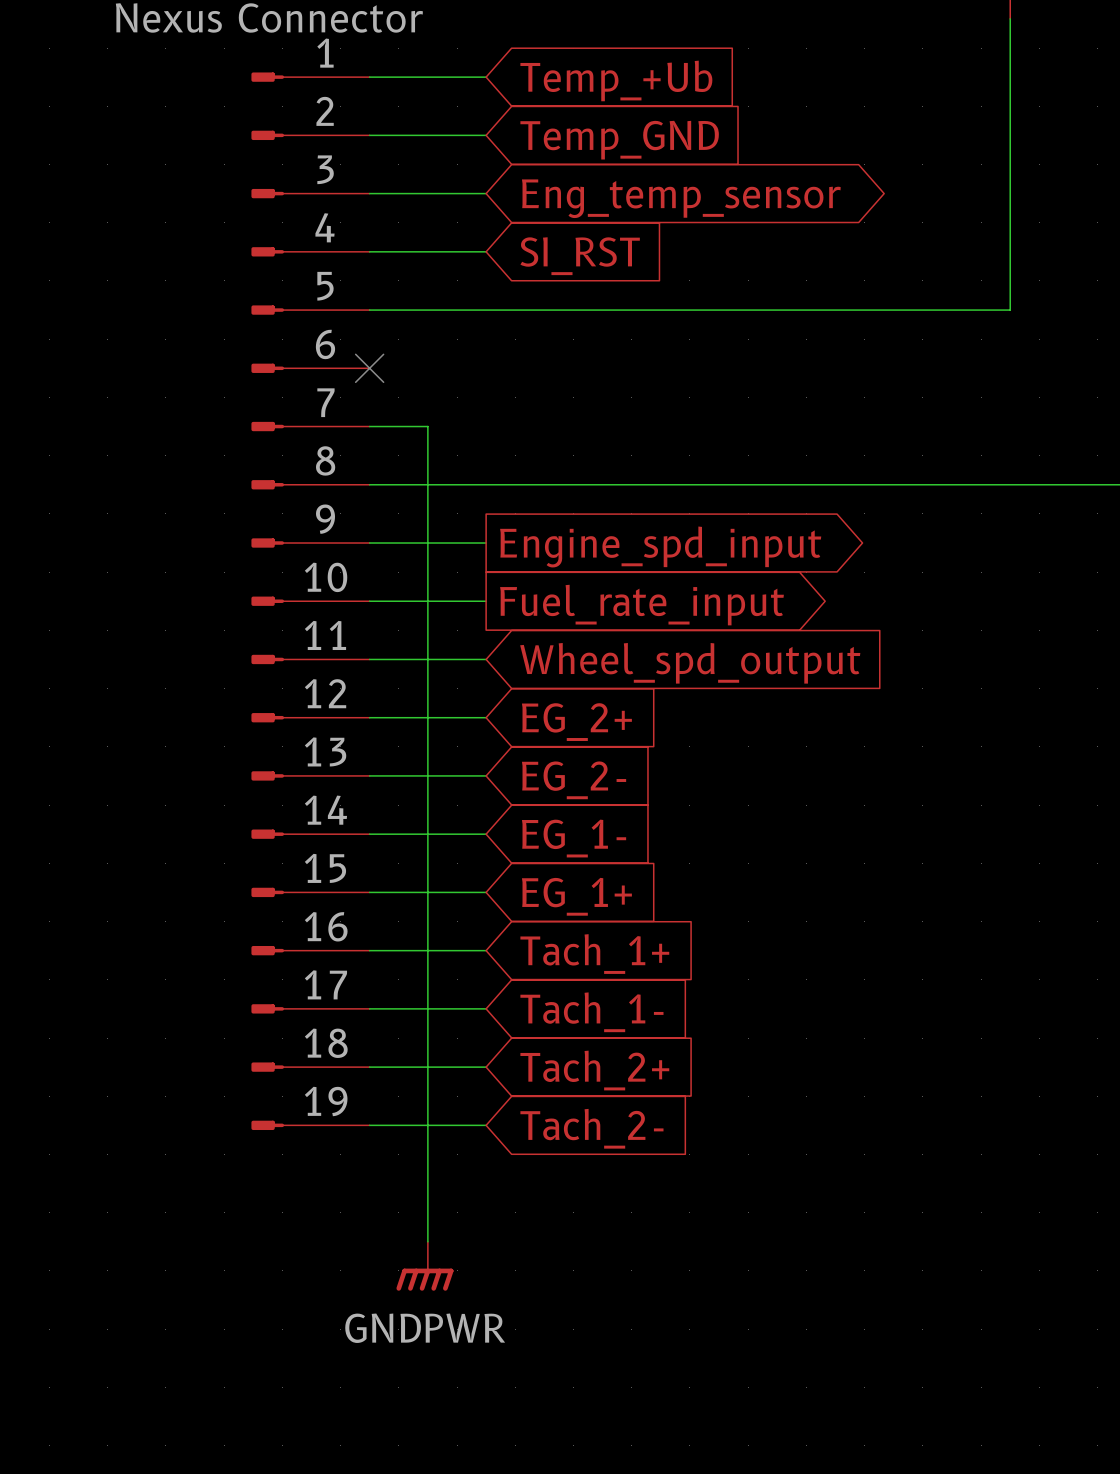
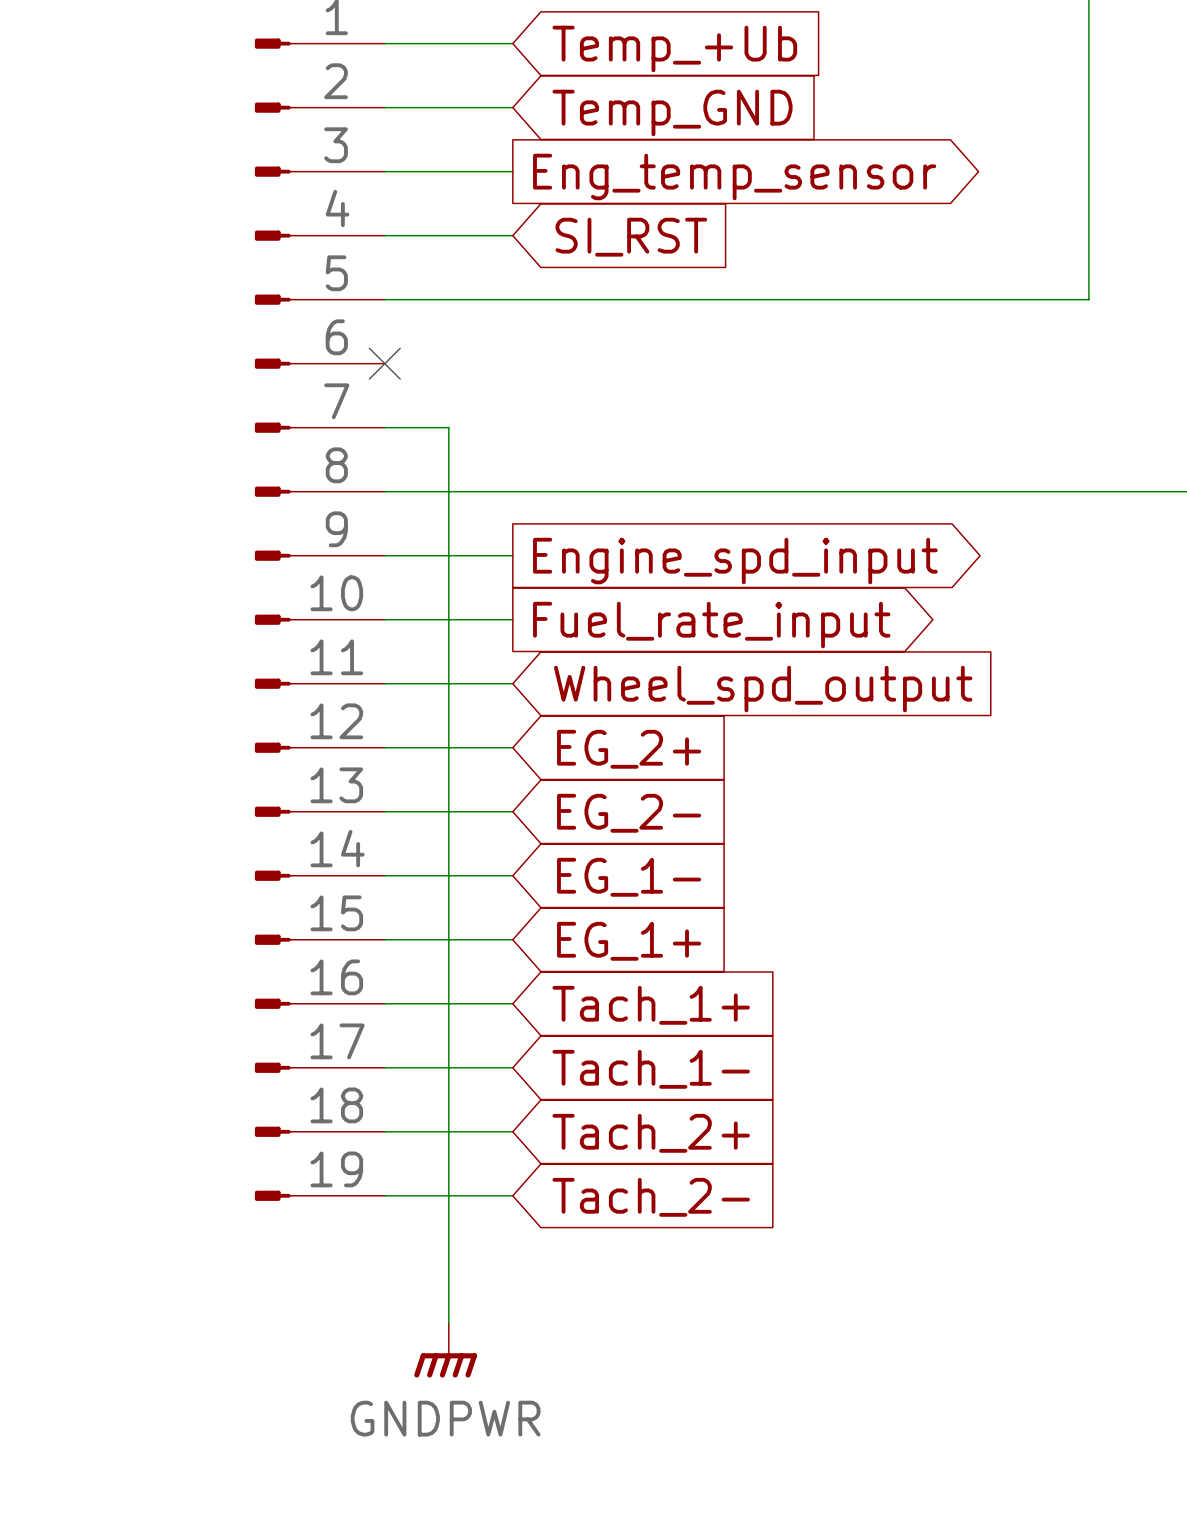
global label shape: bidirectional (681, 198) -> output (734, 176)

